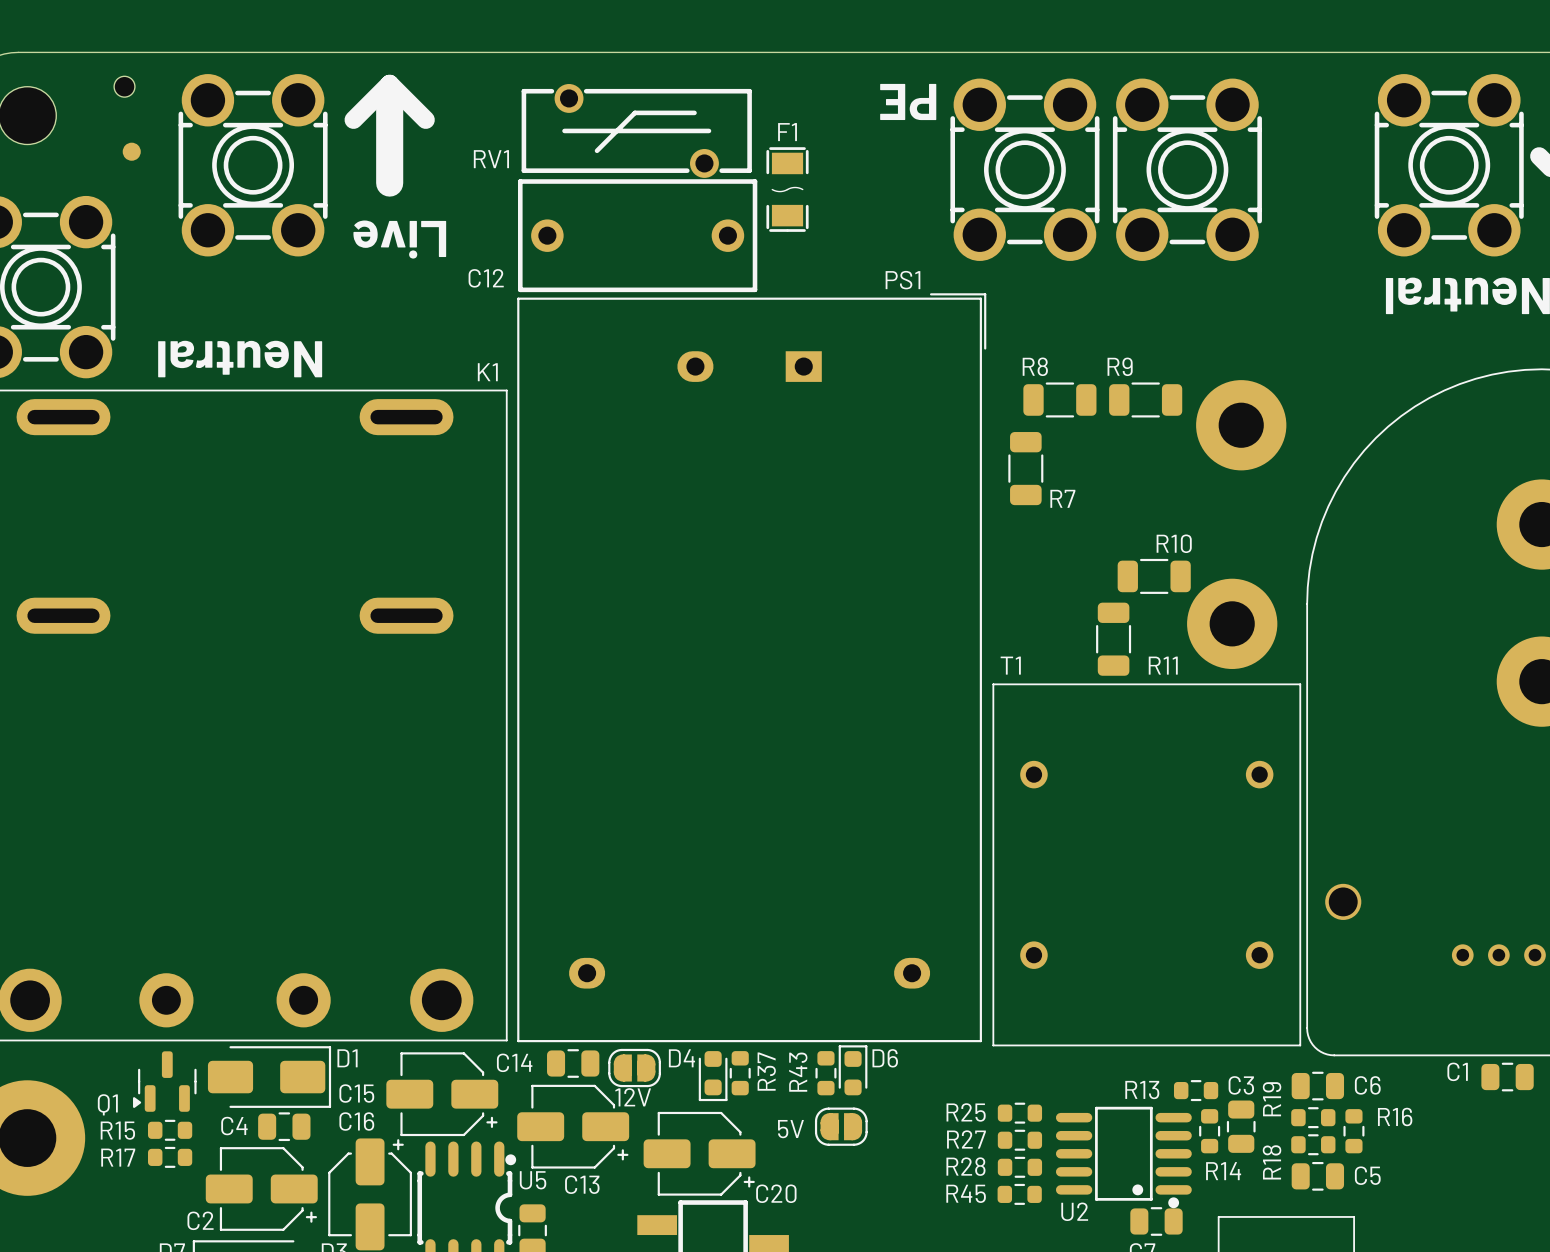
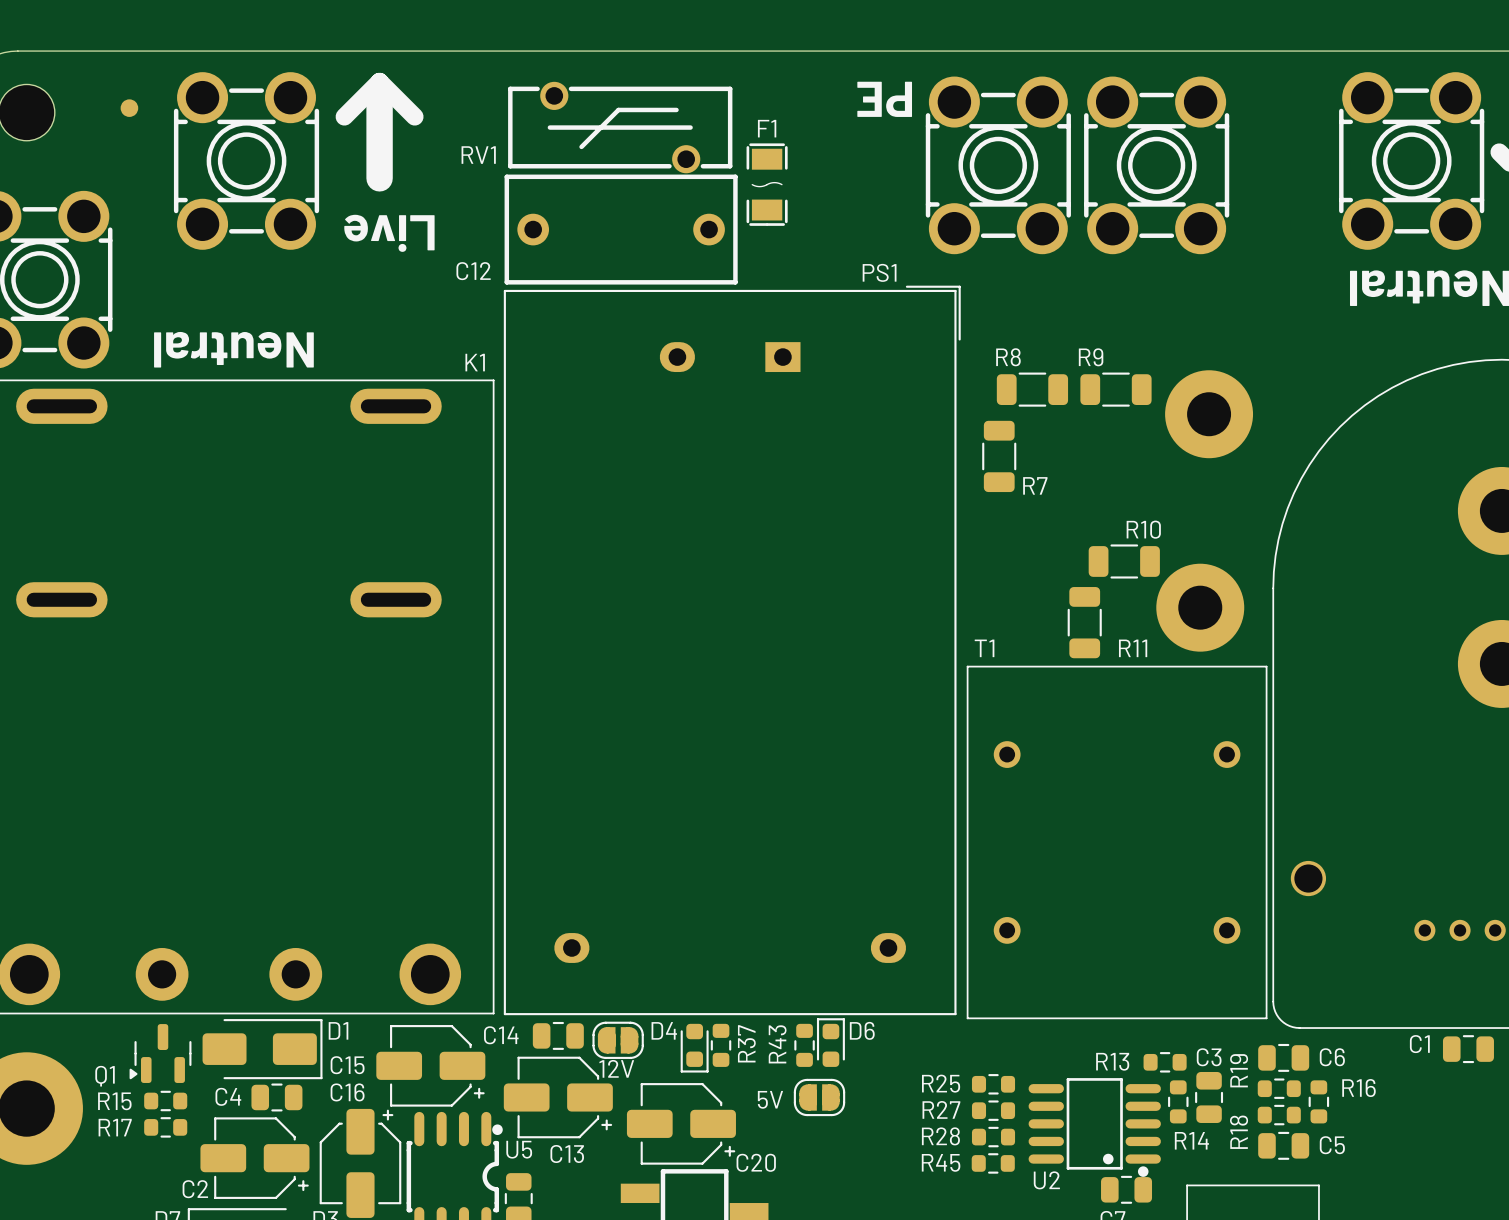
part: (124, 86) -> none
part position: (131, 151) -> (129, 108)

